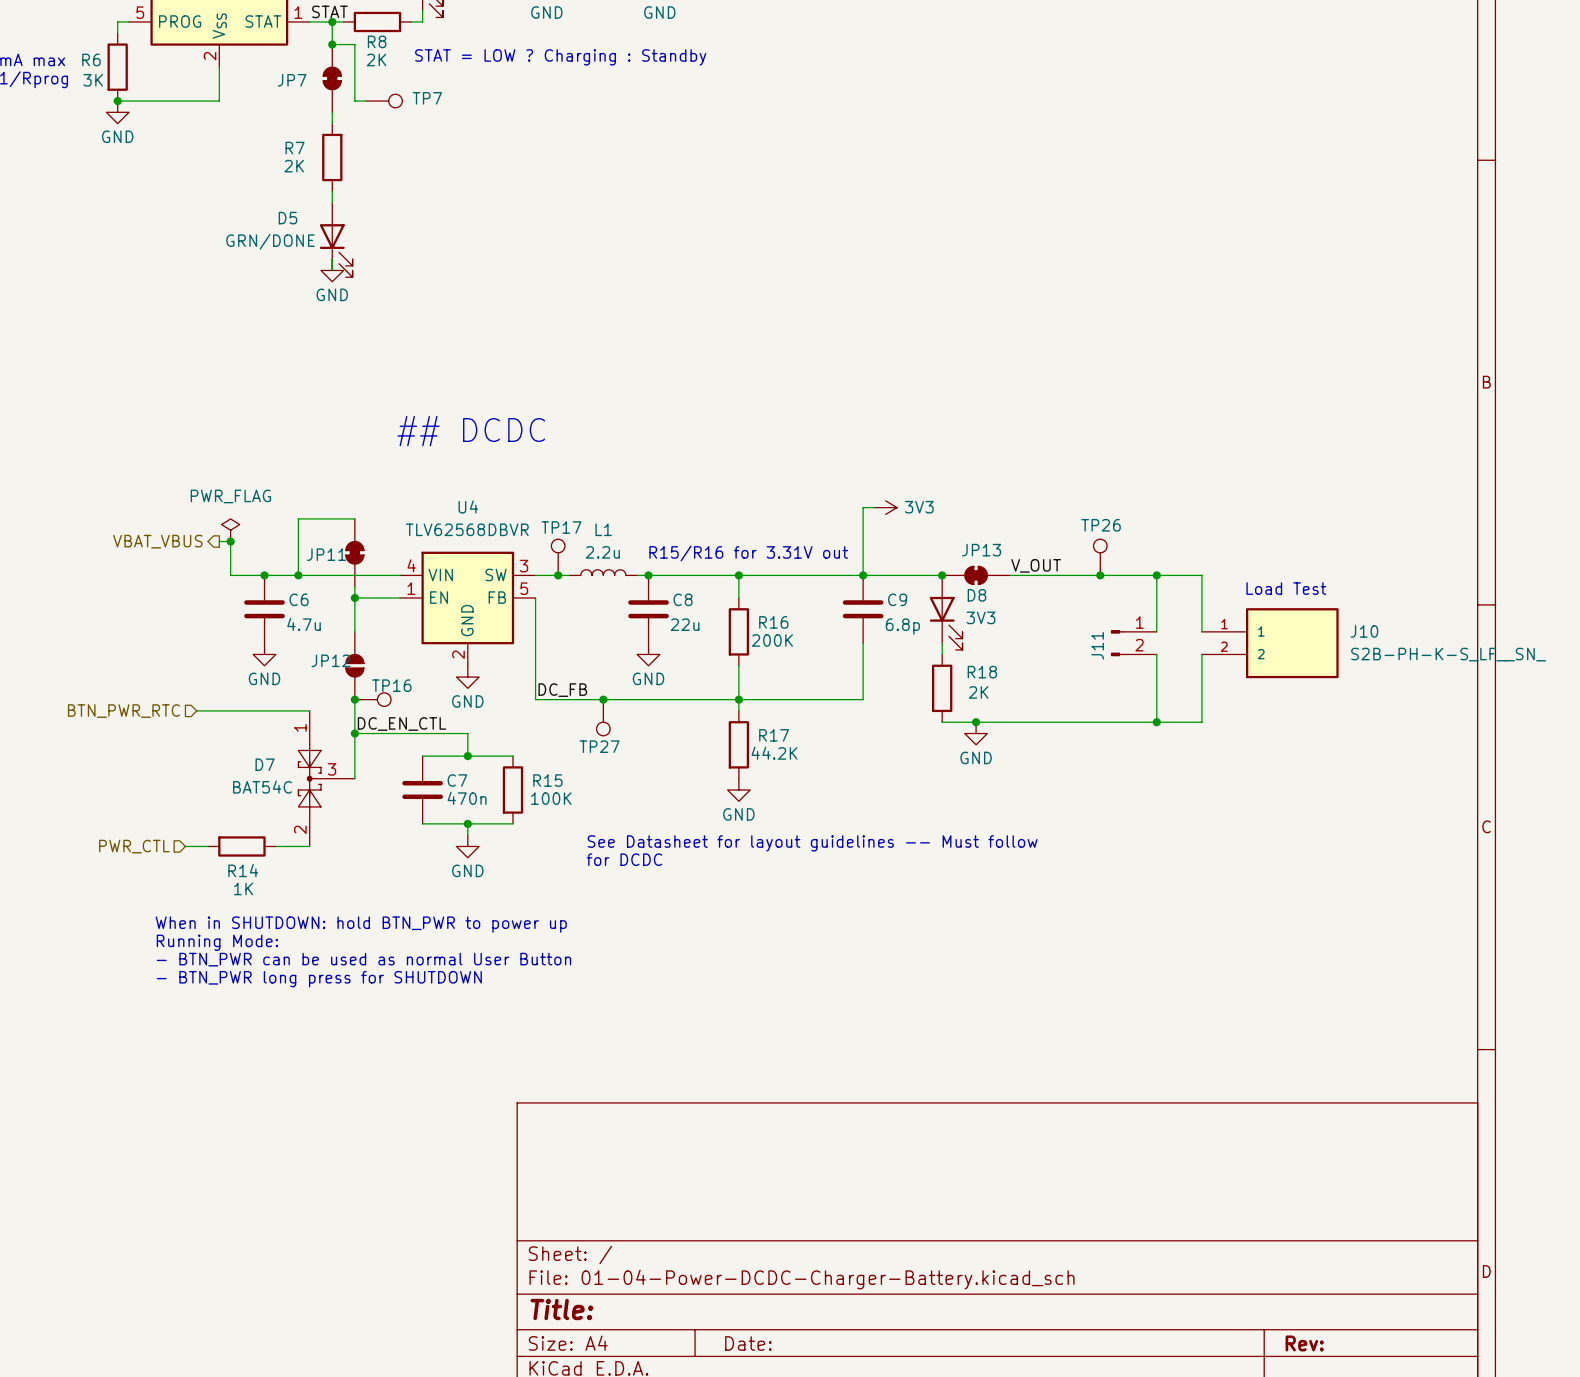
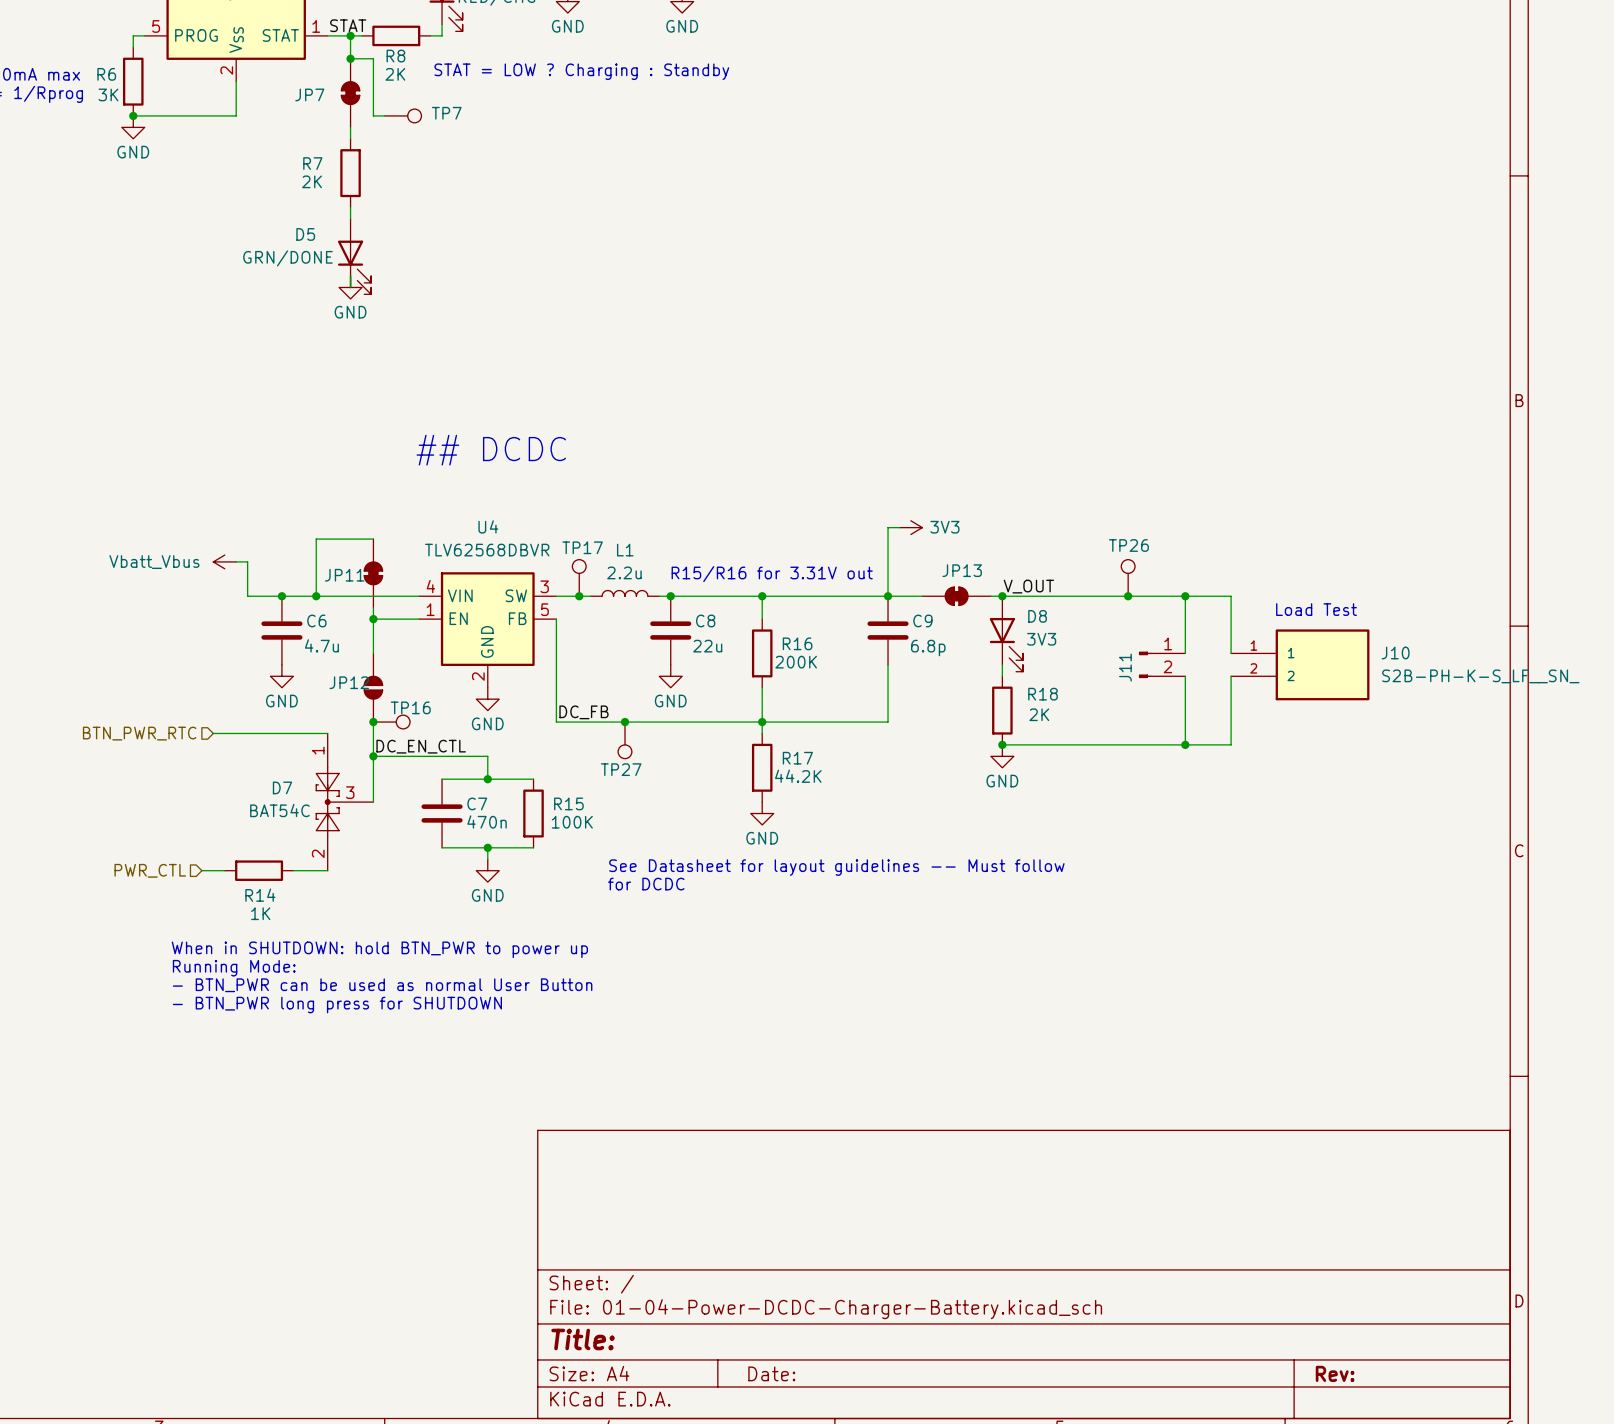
power symbol: PWR_FLAG (230, 530) -> none
hierarchical label: VBAT_VBUS (157, 541) -> none
power symbol: none -> Vbatt_Vbus (224, 561)
junction: (230, 541) -> none
label position: V_OUT (1036, 565) -> V_OUT (1028, 586)
junction position: (942, 575) -> (1002, 596)
JP13 position: (976, 575) -> (956, 596)
D8 position: (946, 612) -> (1006, 633)
wire: (942, 643) (942, 654) -> (1002, 664) (1002, 676)
R18 position: (942, 688) -> (1002, 710)
wire: (942, 722) (976, 722) -> none

